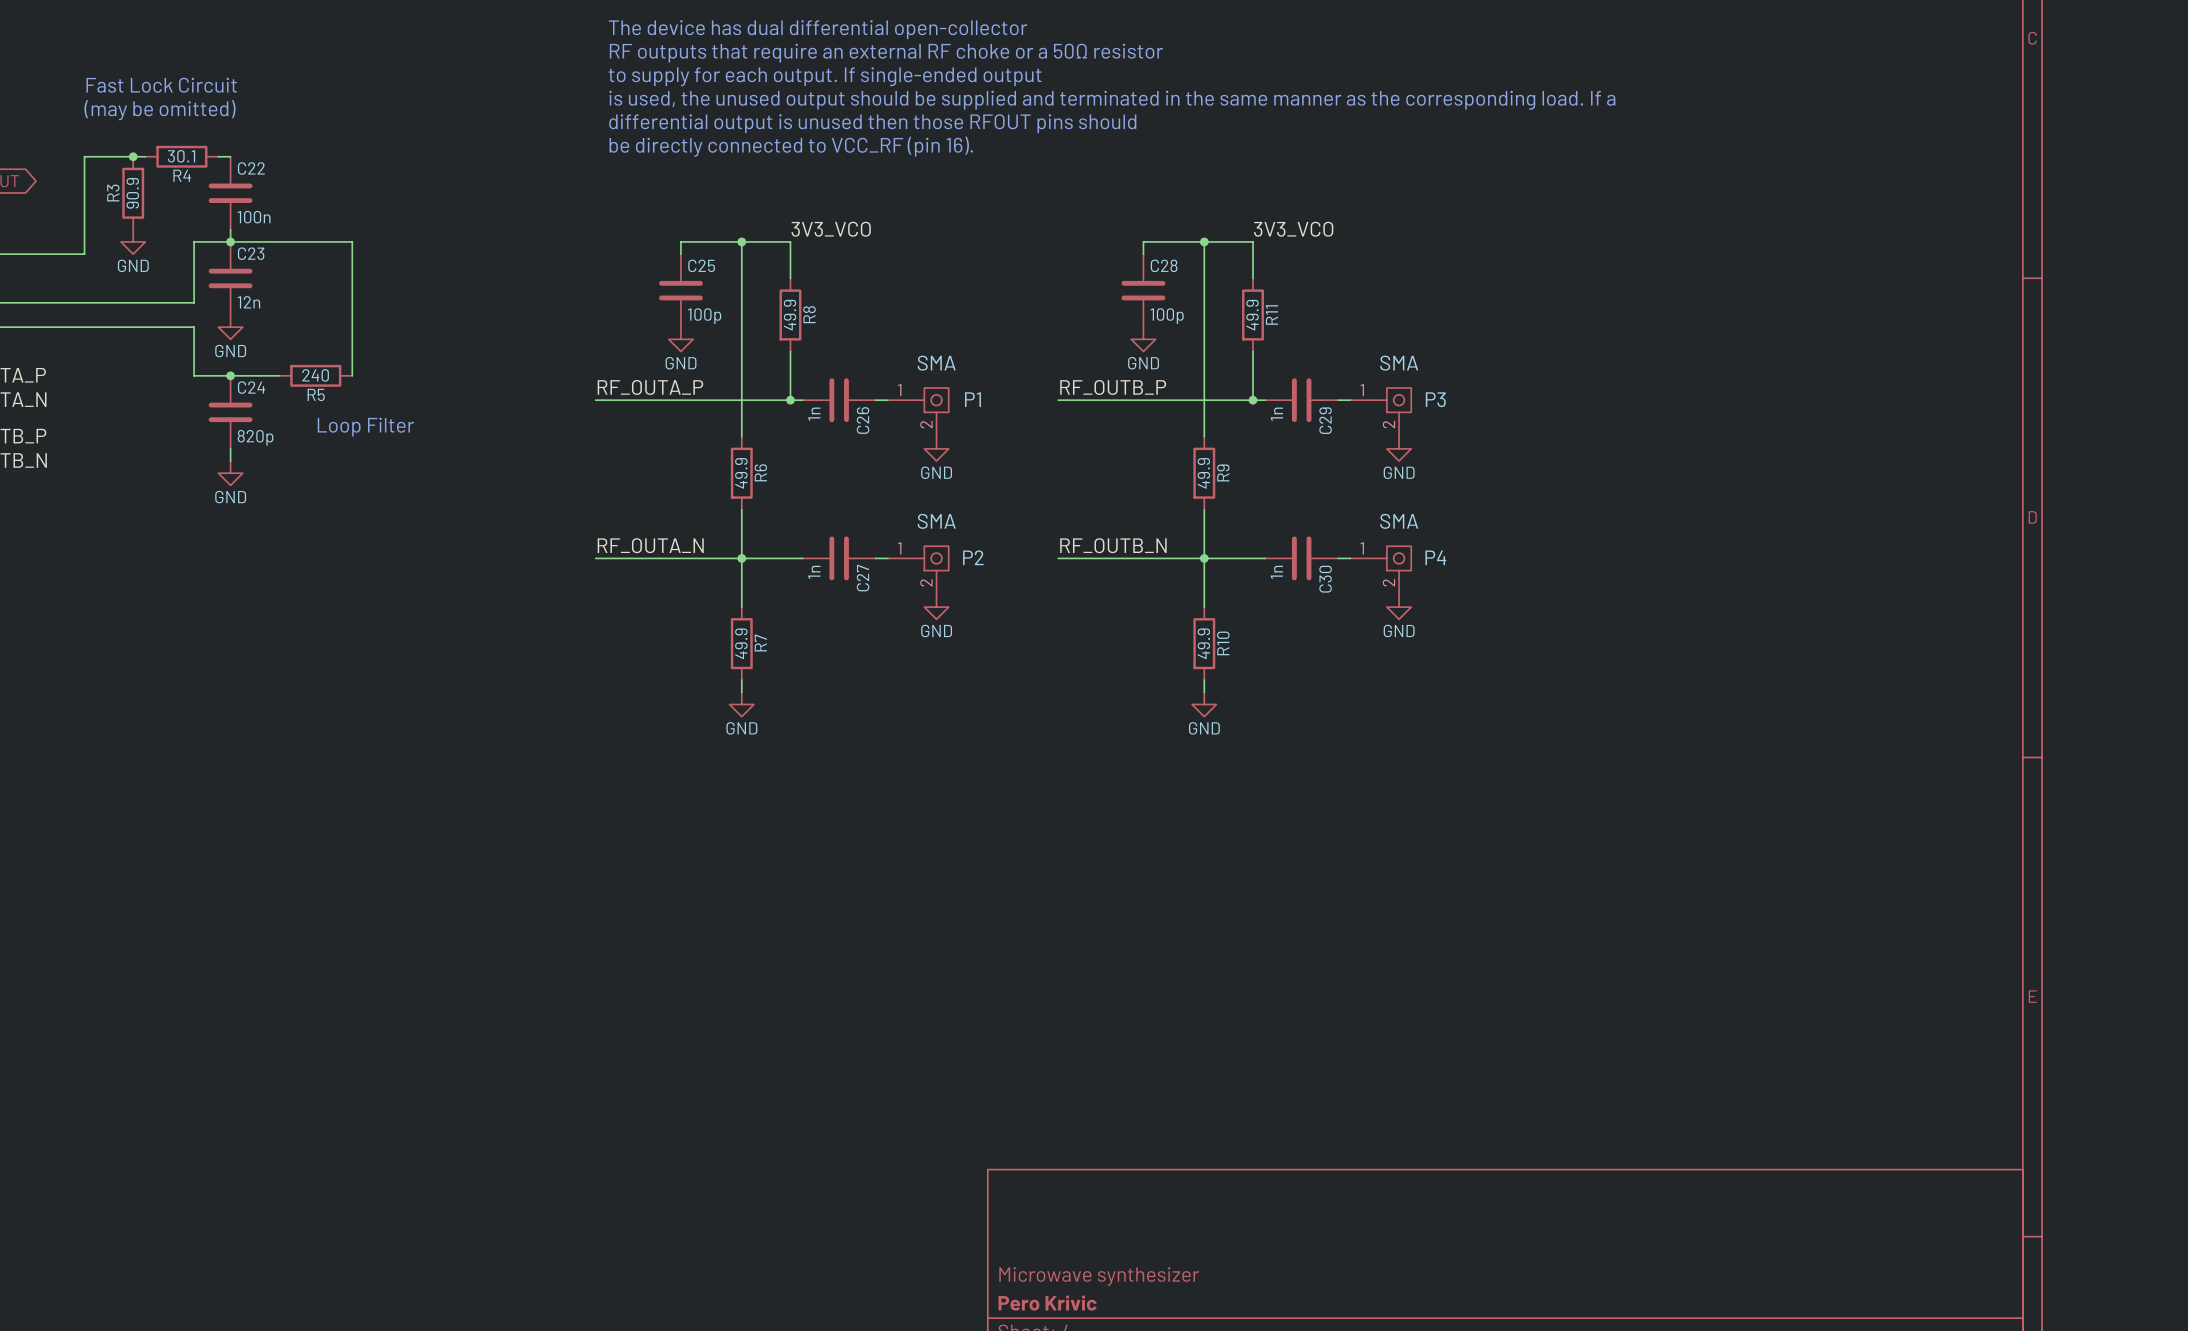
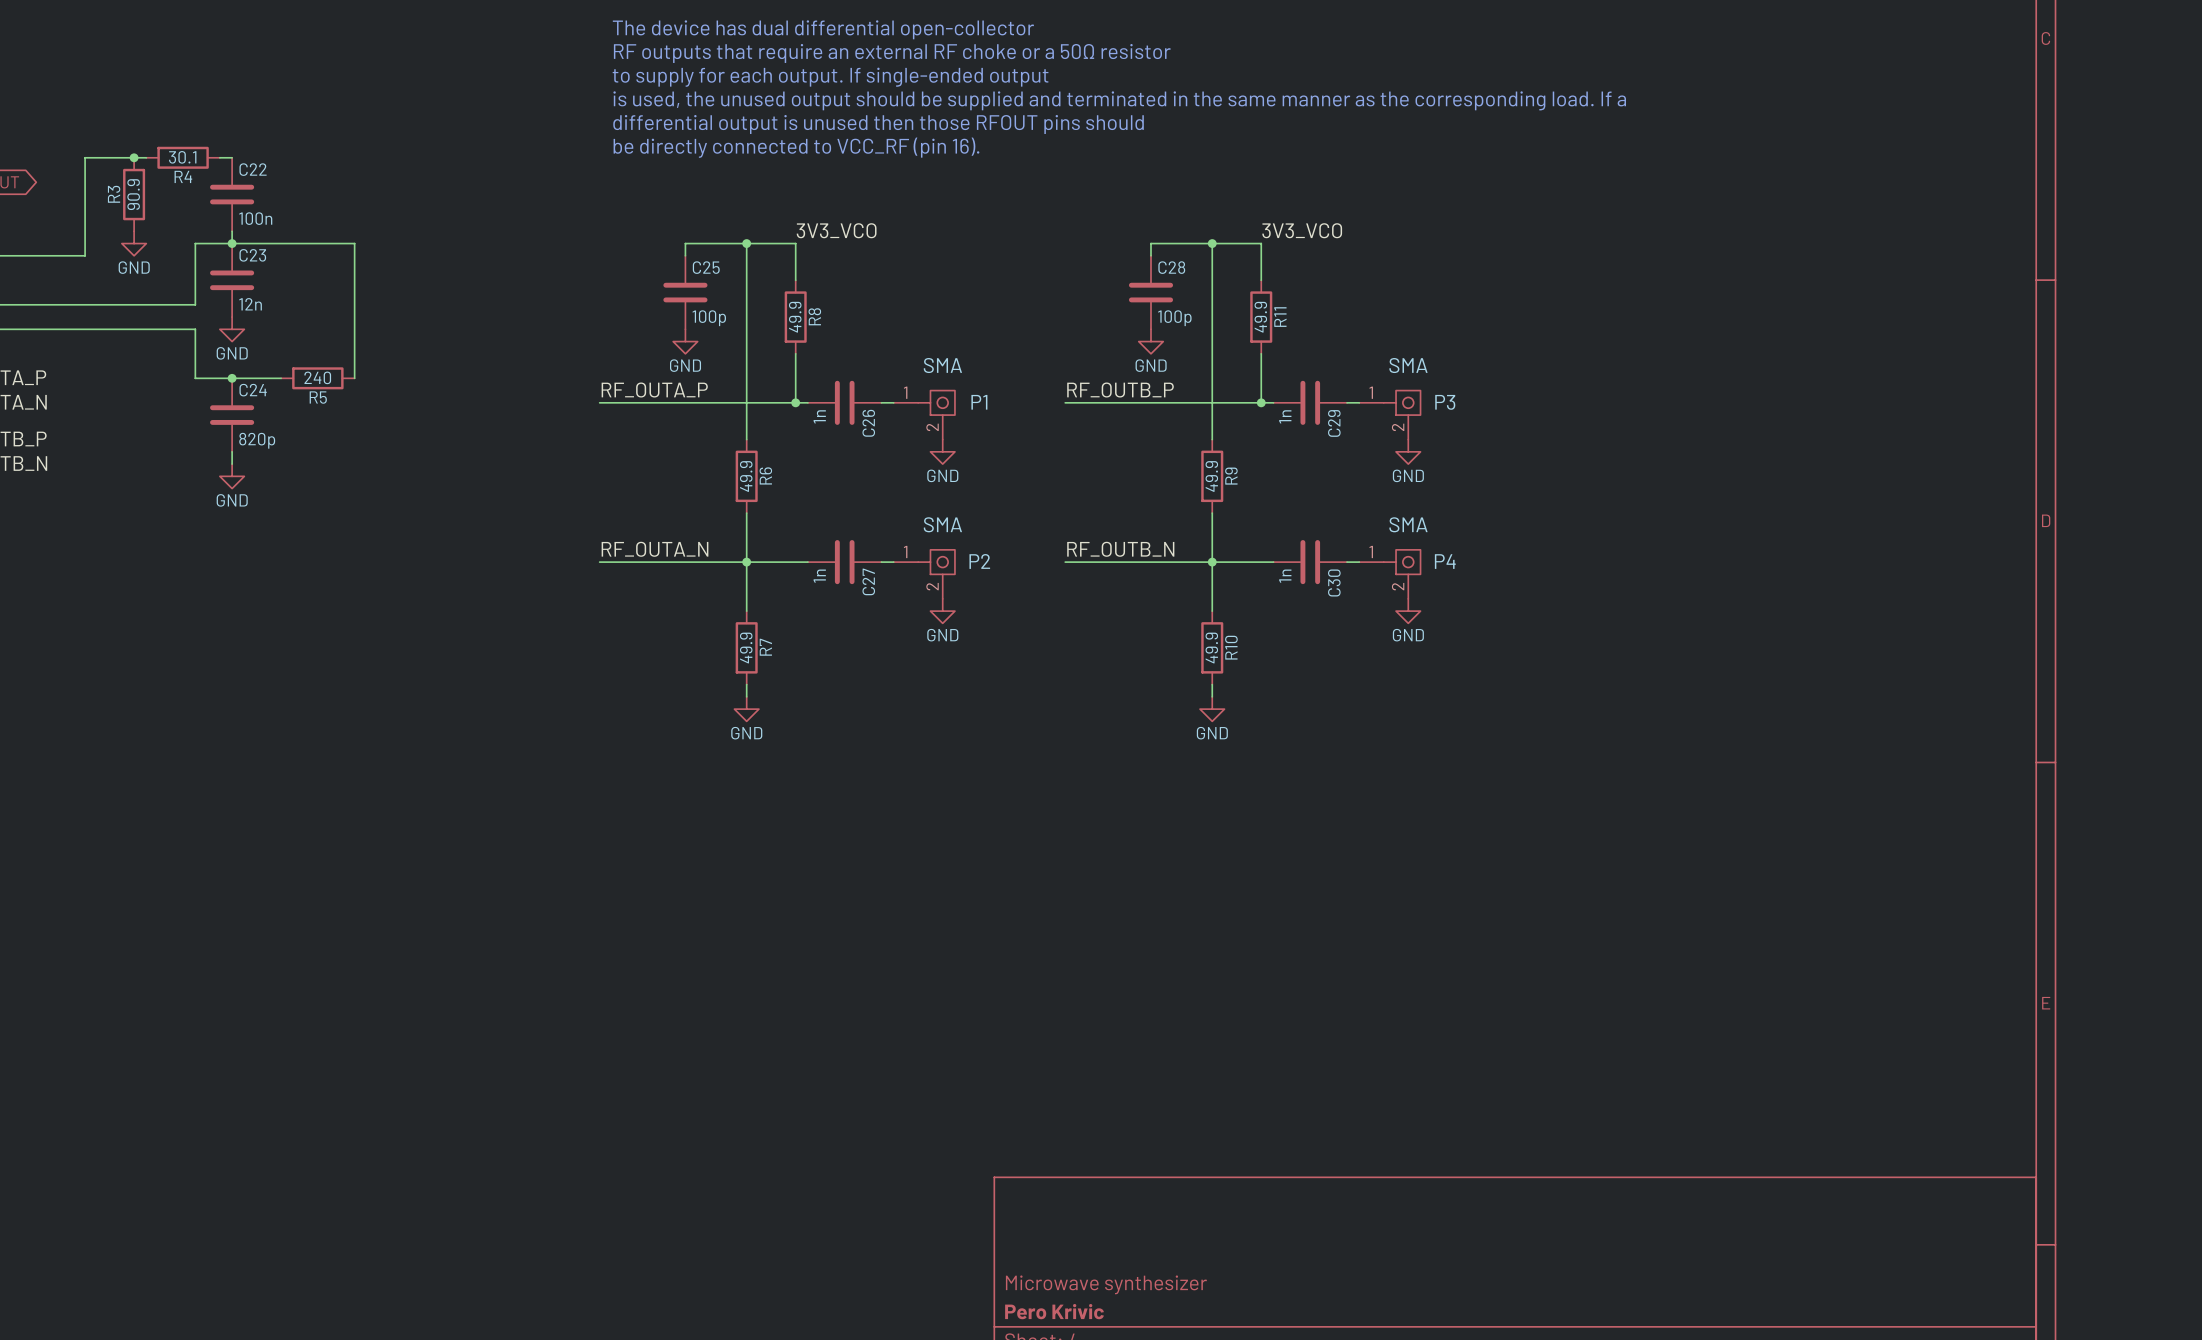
text: Fast Lock Circuit (161, 85) -> none
text: (may be omitted) (159, 110) -> none
text: Loop Filter (365, 427) -> none

